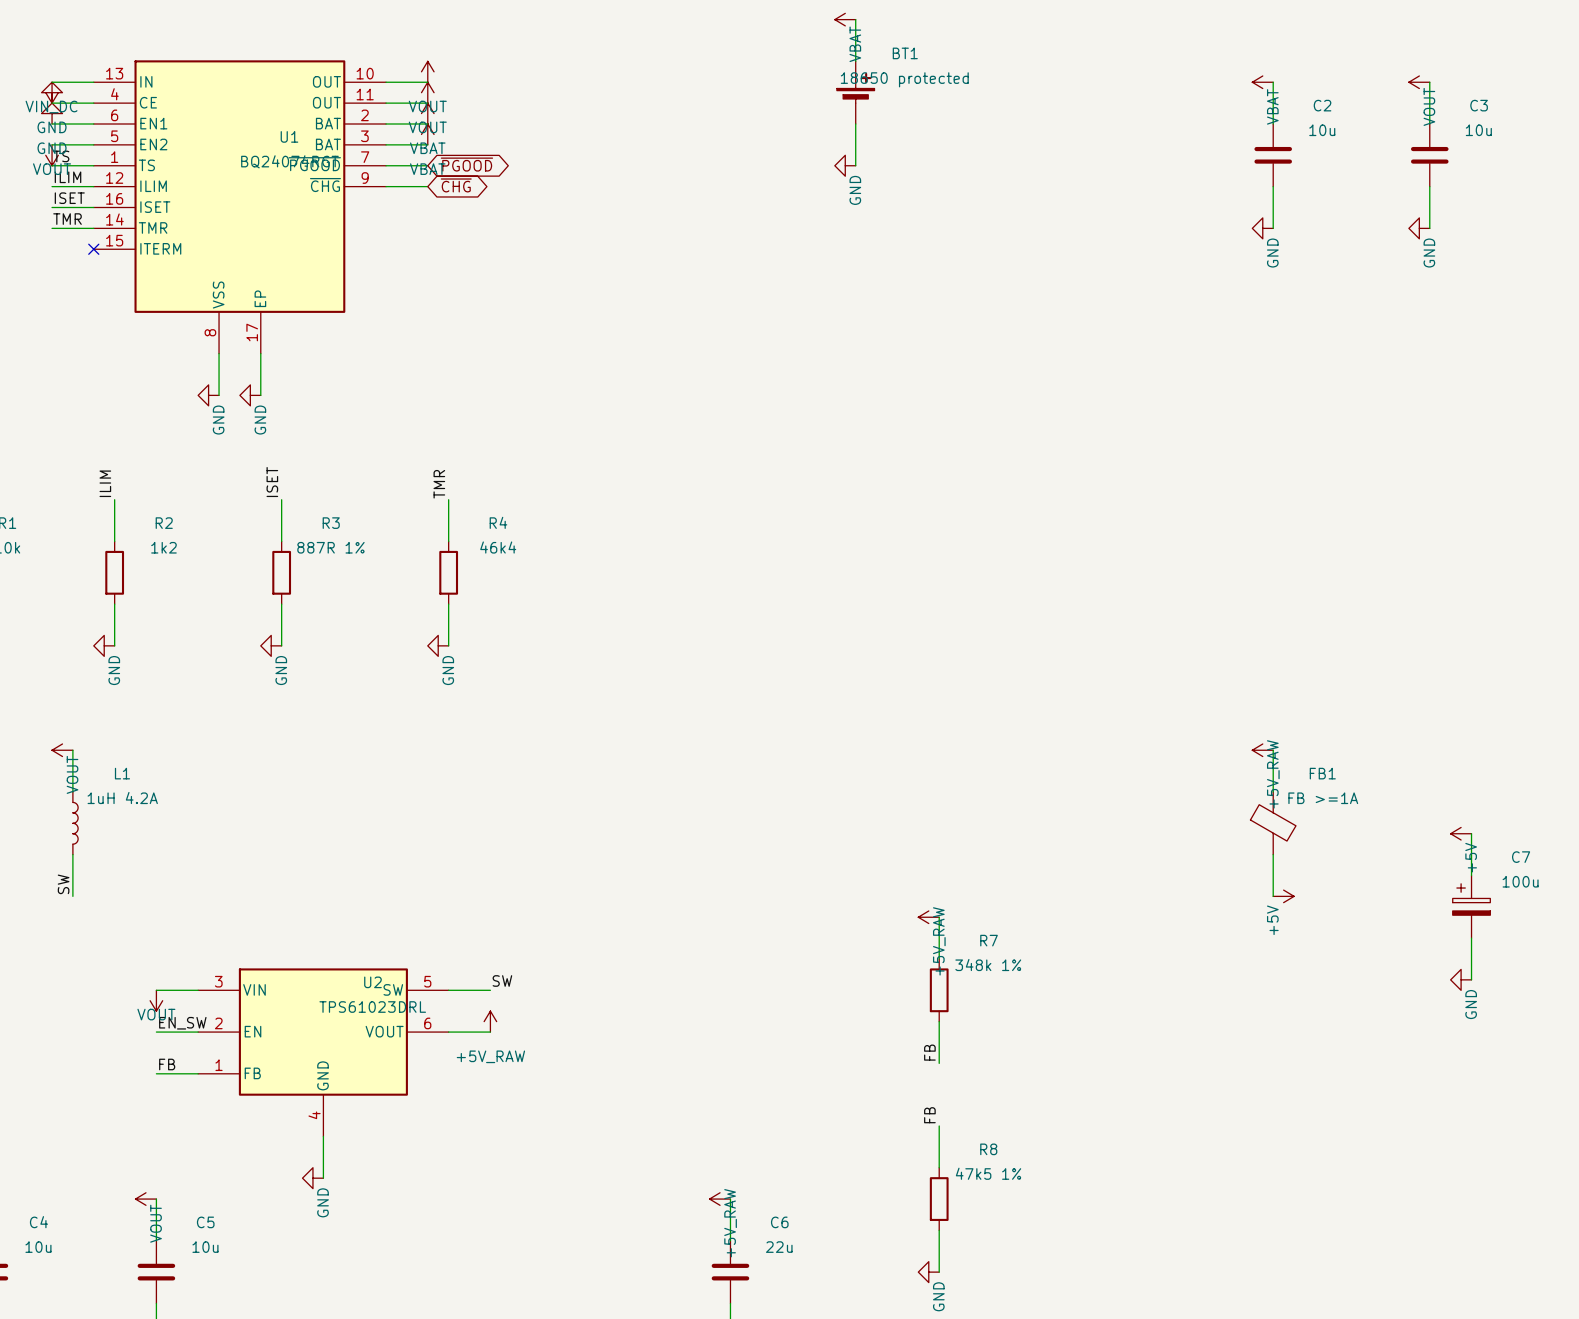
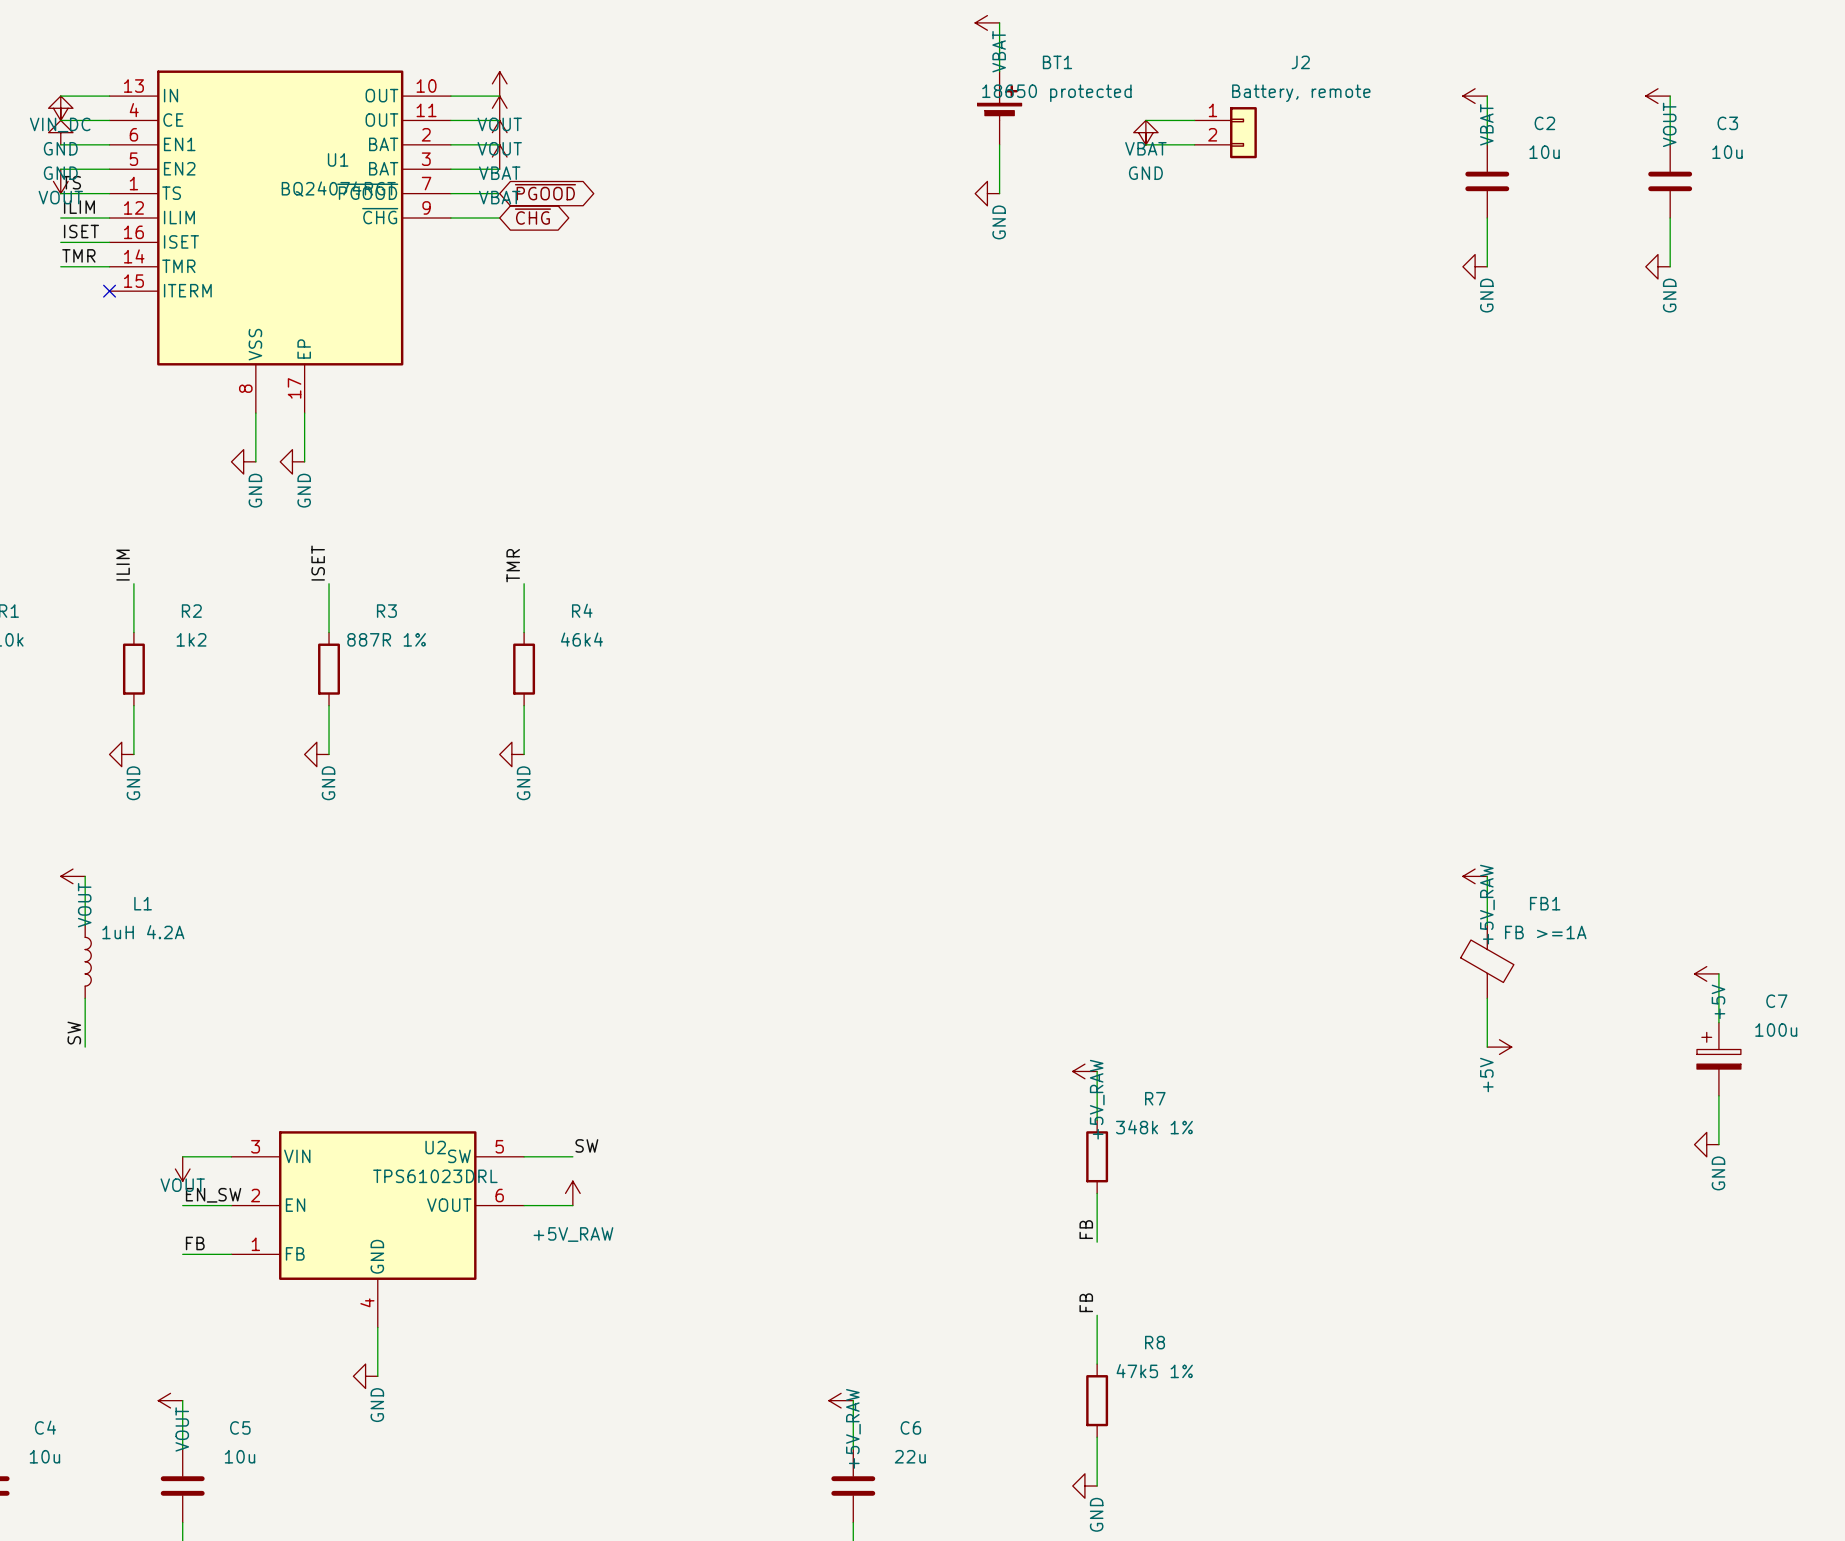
wire: none -> (1145, 120) (1194, 120)
power symbol: none -> VBAT (1145, 132)
power symbol: none -> GND (1145, 132)
J2: none -> Battery, remote (1225, 132)
wire: none -> (1145, 144) (1194, 144)

